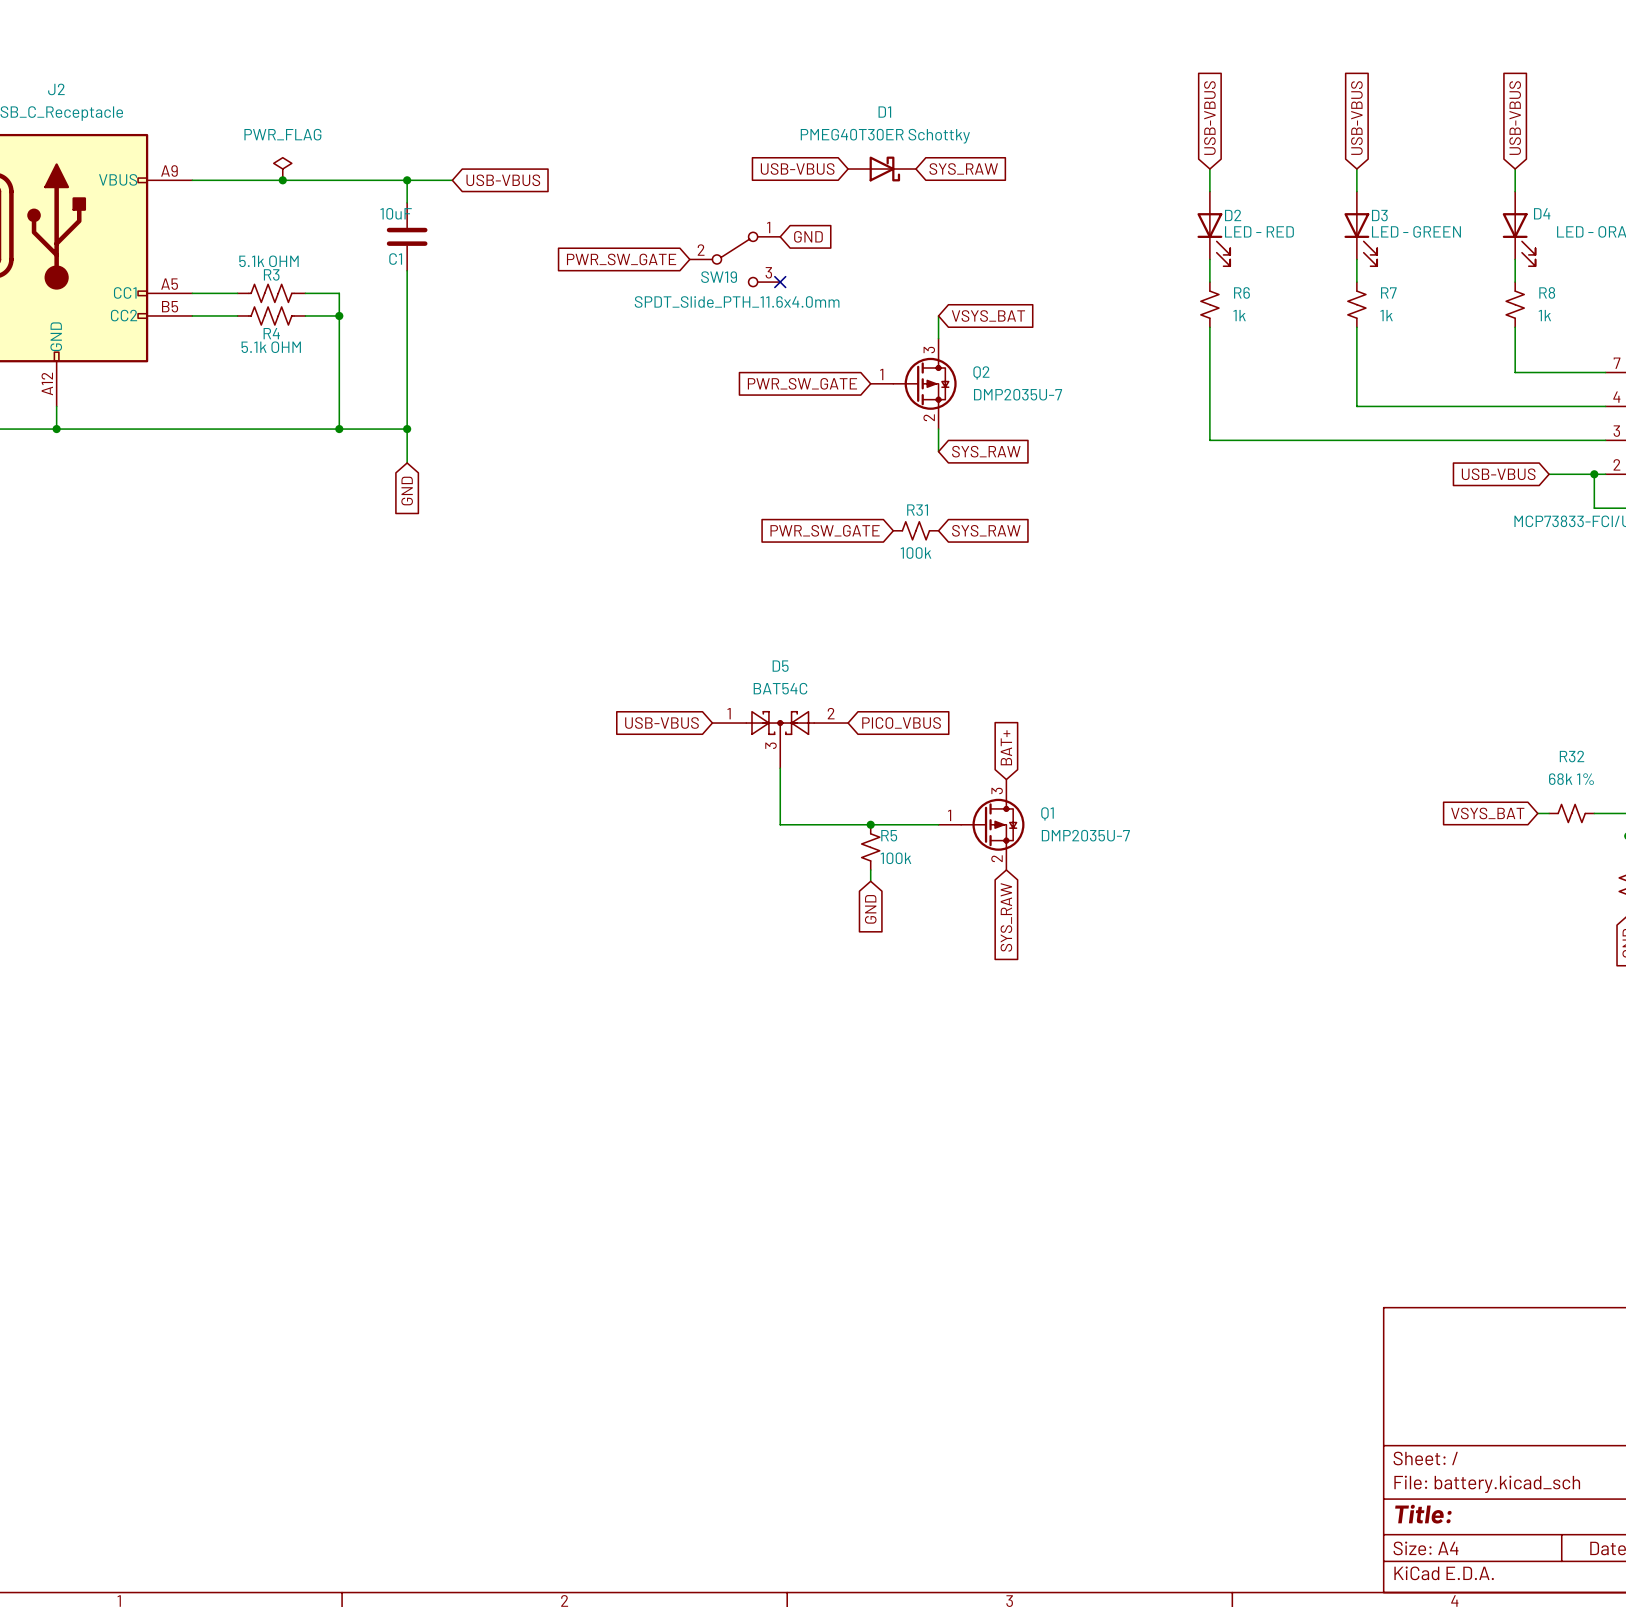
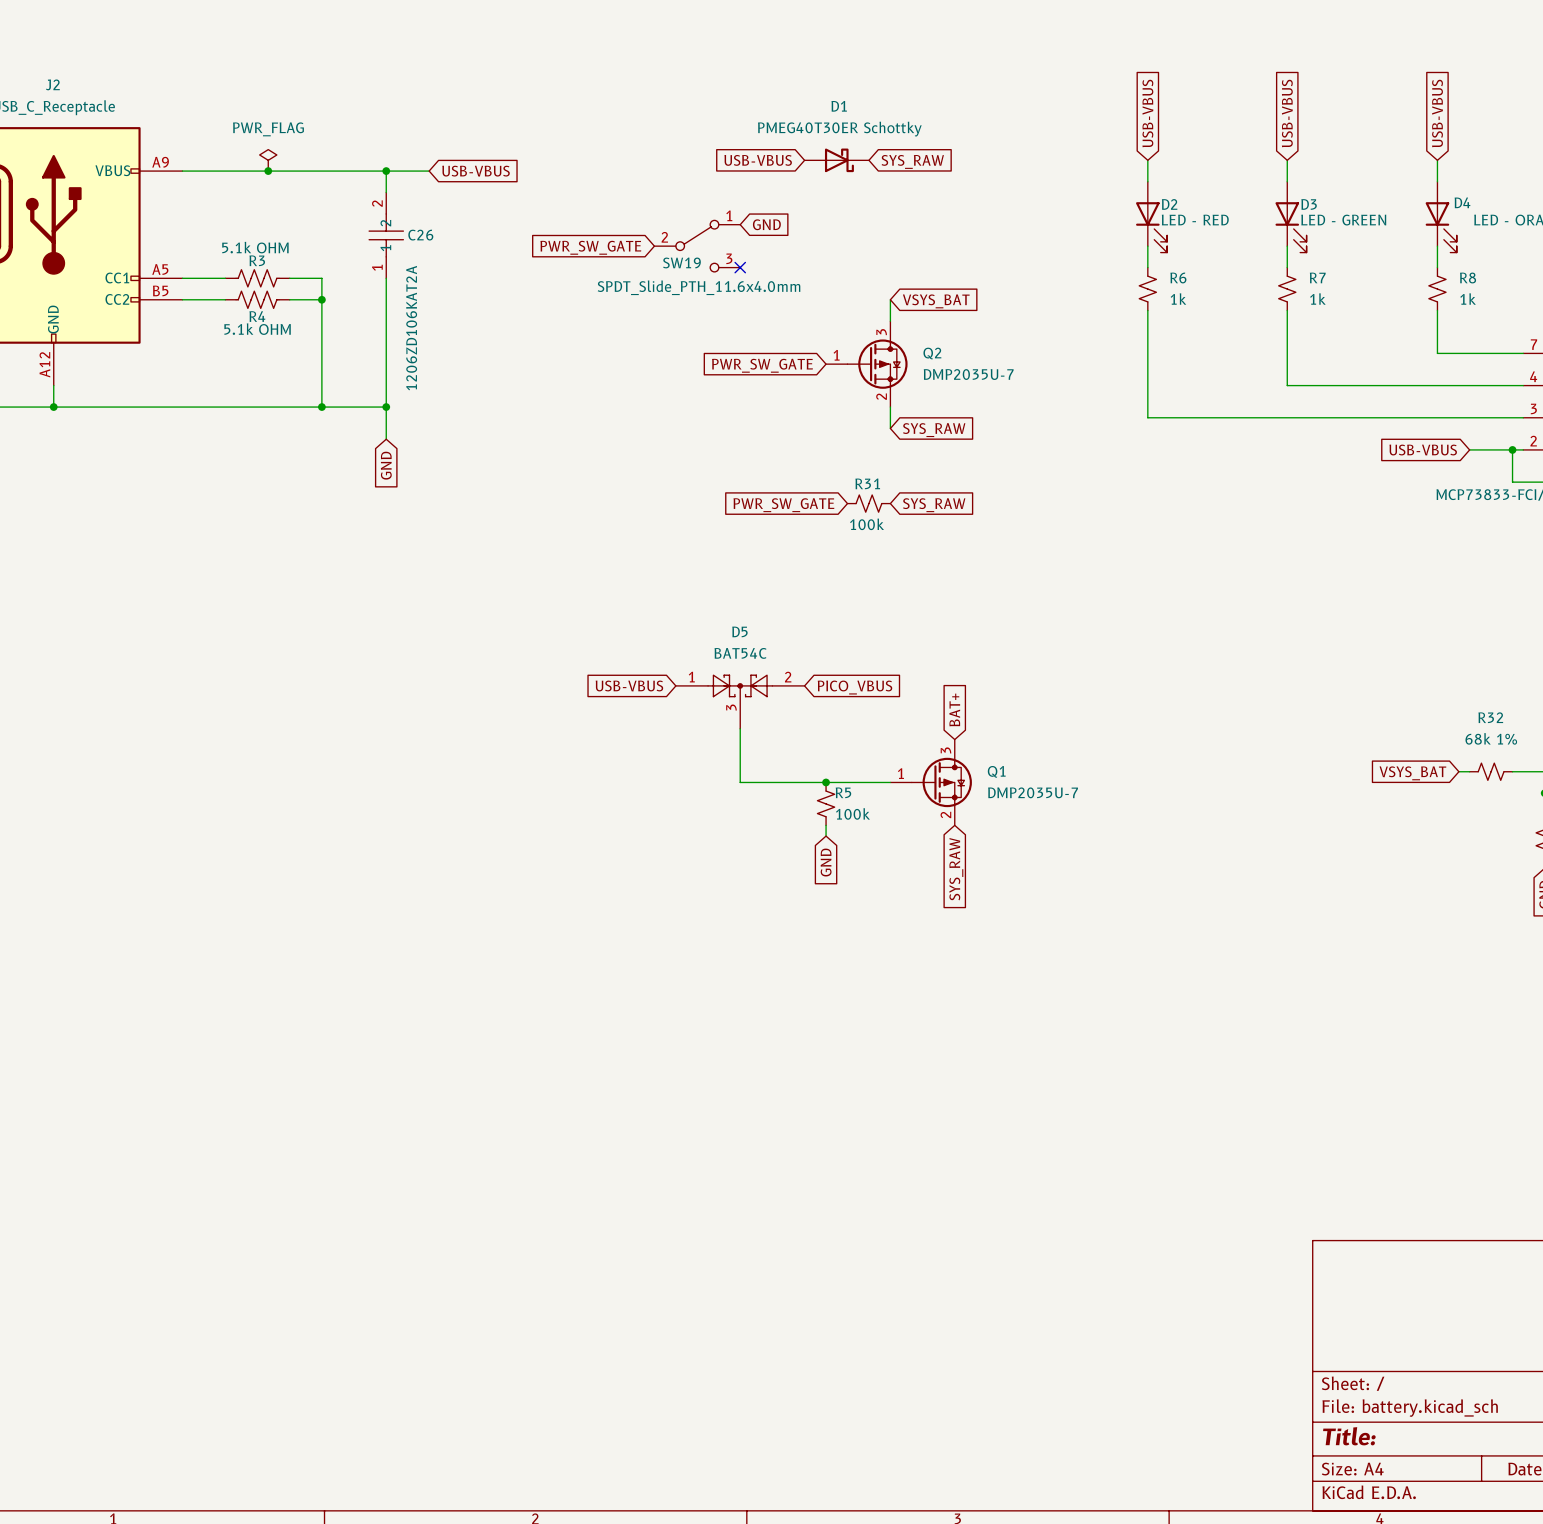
C1: 10uF (407, 236) -> none
C26: none -> 1206ZD106KAT2A (386, 235)

